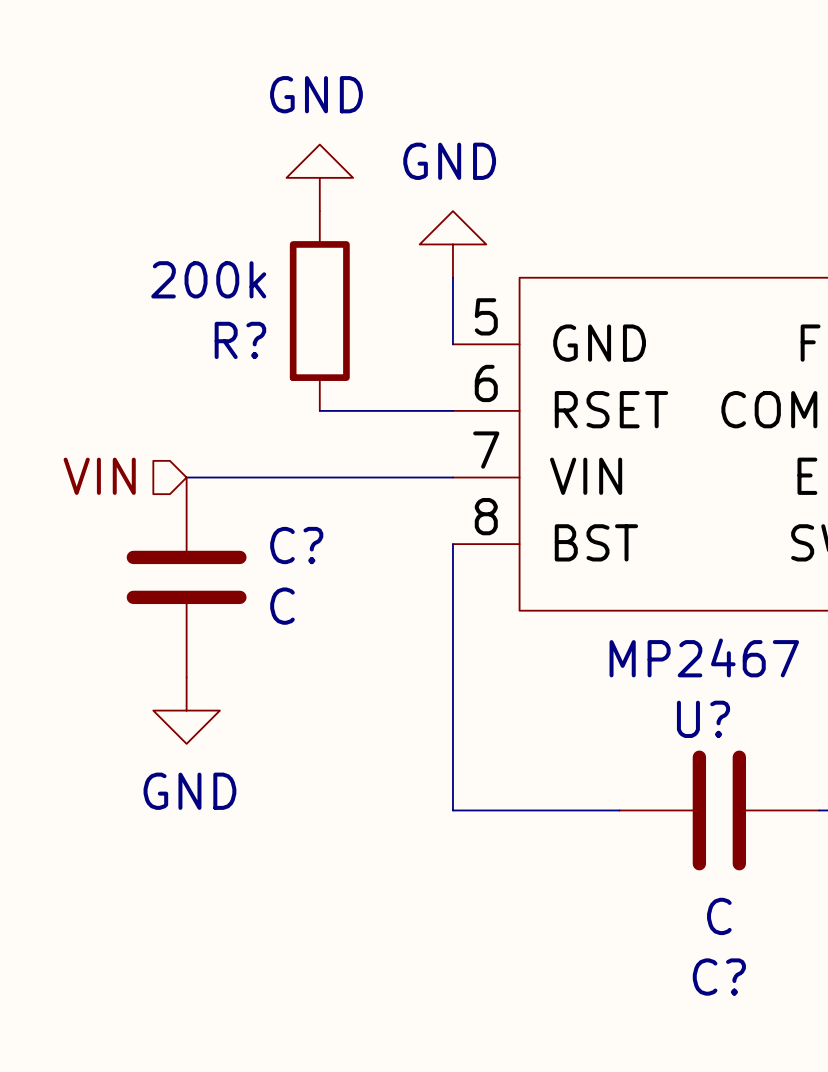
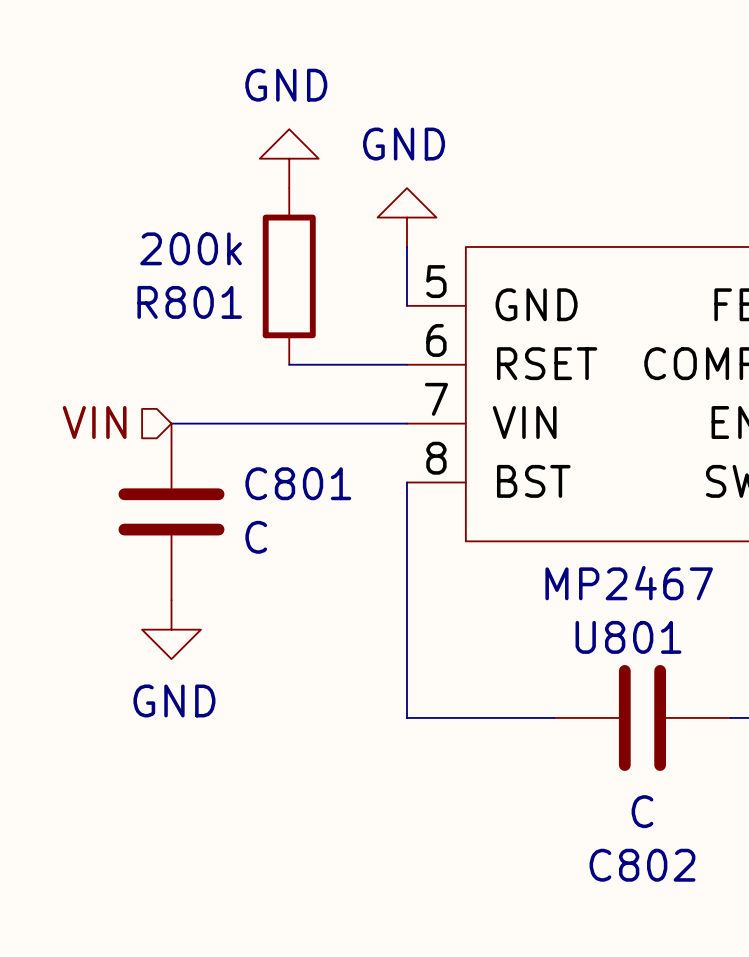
R? name: R? (240, 340) -> R801 (189, 302)
C? name: C? (296, 545) -> C801 (298, 483)
U? name: U? (703, 719) -> U801 (628, 637)
C? name: C? (719, 977) -> C802 (642, 865)

